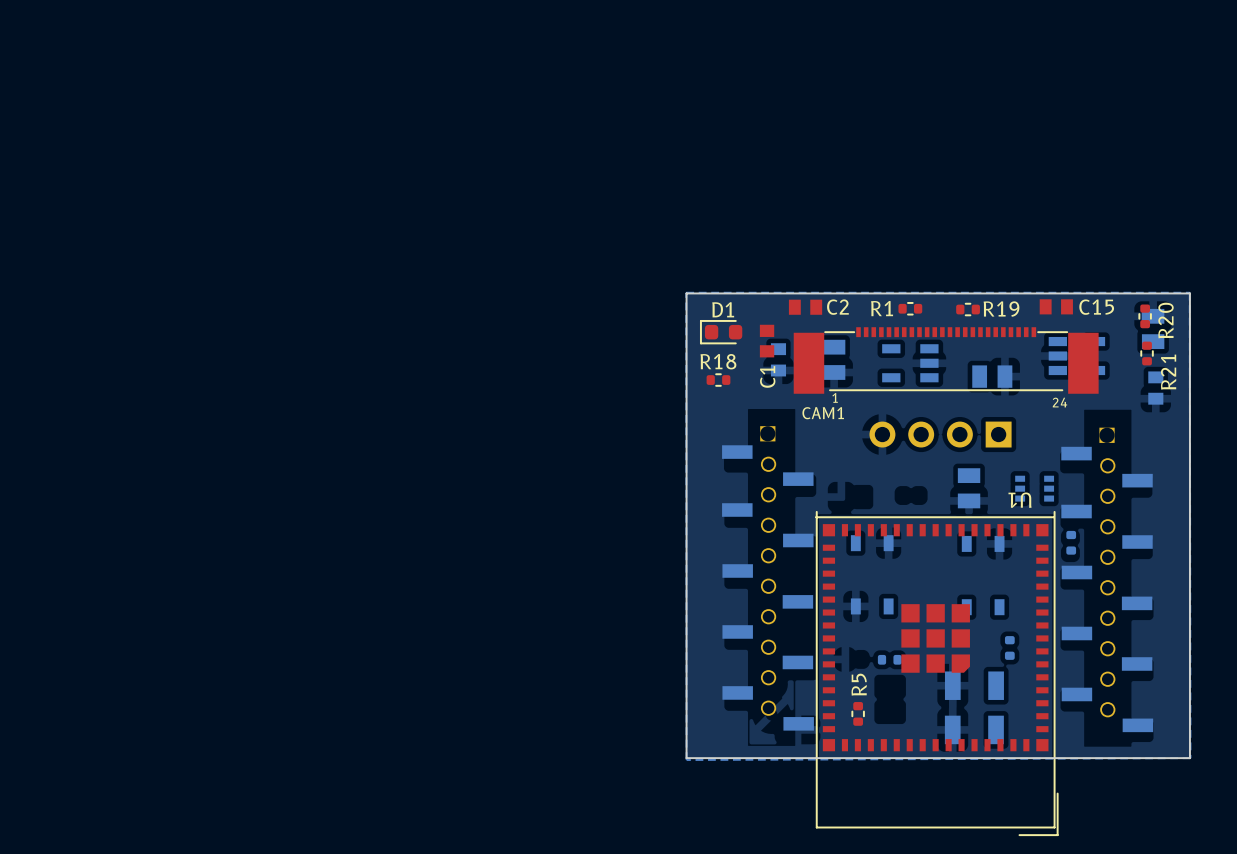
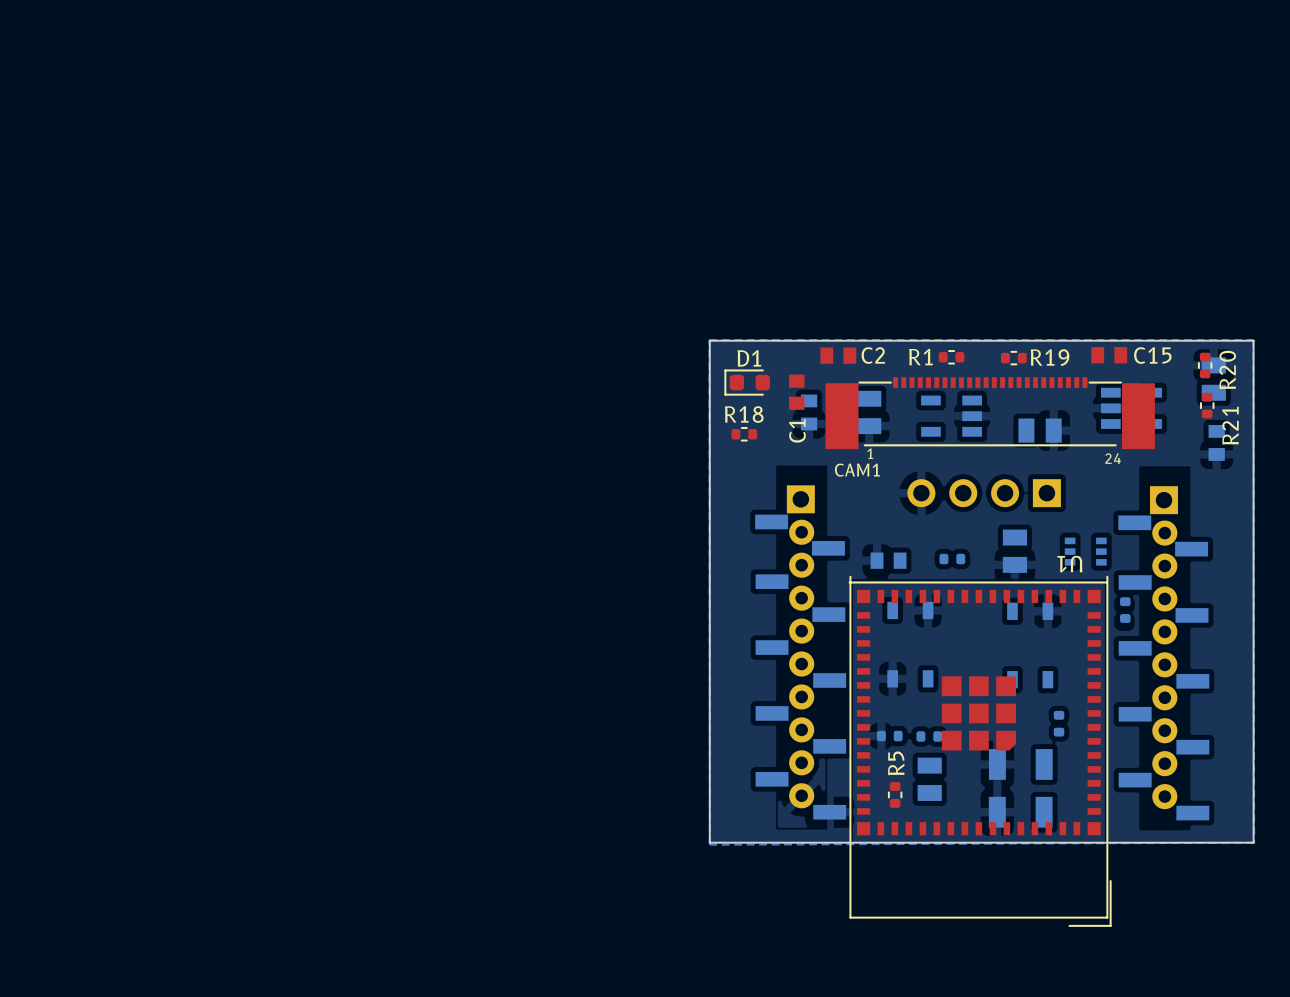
part footprint: [722, 426, 814, 731] -> [755, 485, 847, 820]
part footprint: [1061, 427, 1154, 733] -> [1118, 486, 1210, 821]
part: none -> (952, 559)
part: none -> (888, 560)
part: none -> (889, 736)
part: none -> (929, 779)

